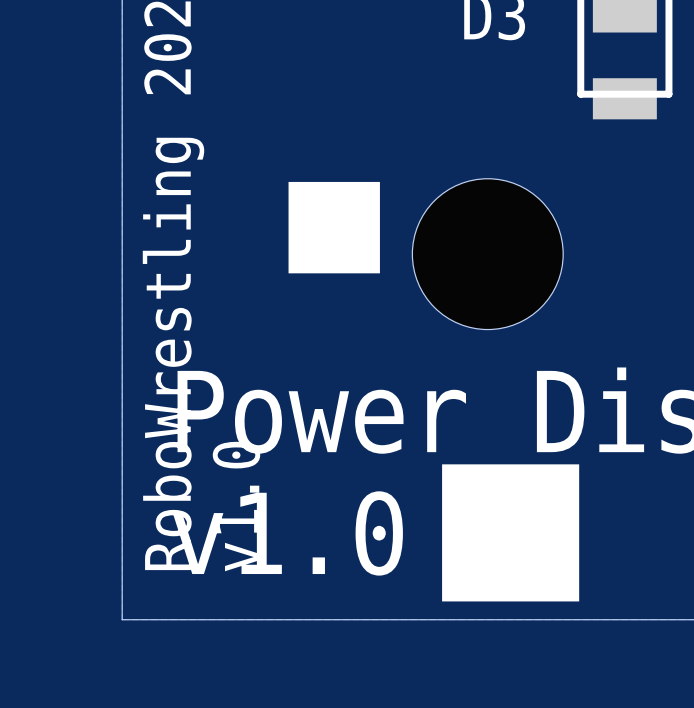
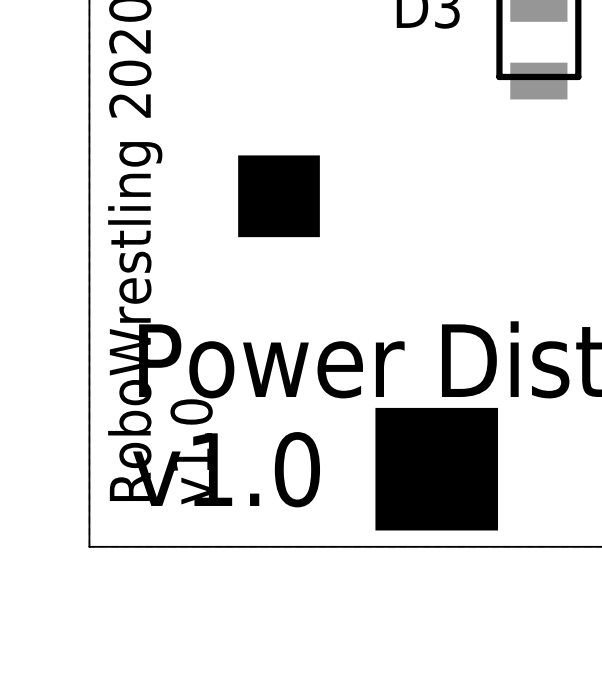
hole: (487, 254) -> none

